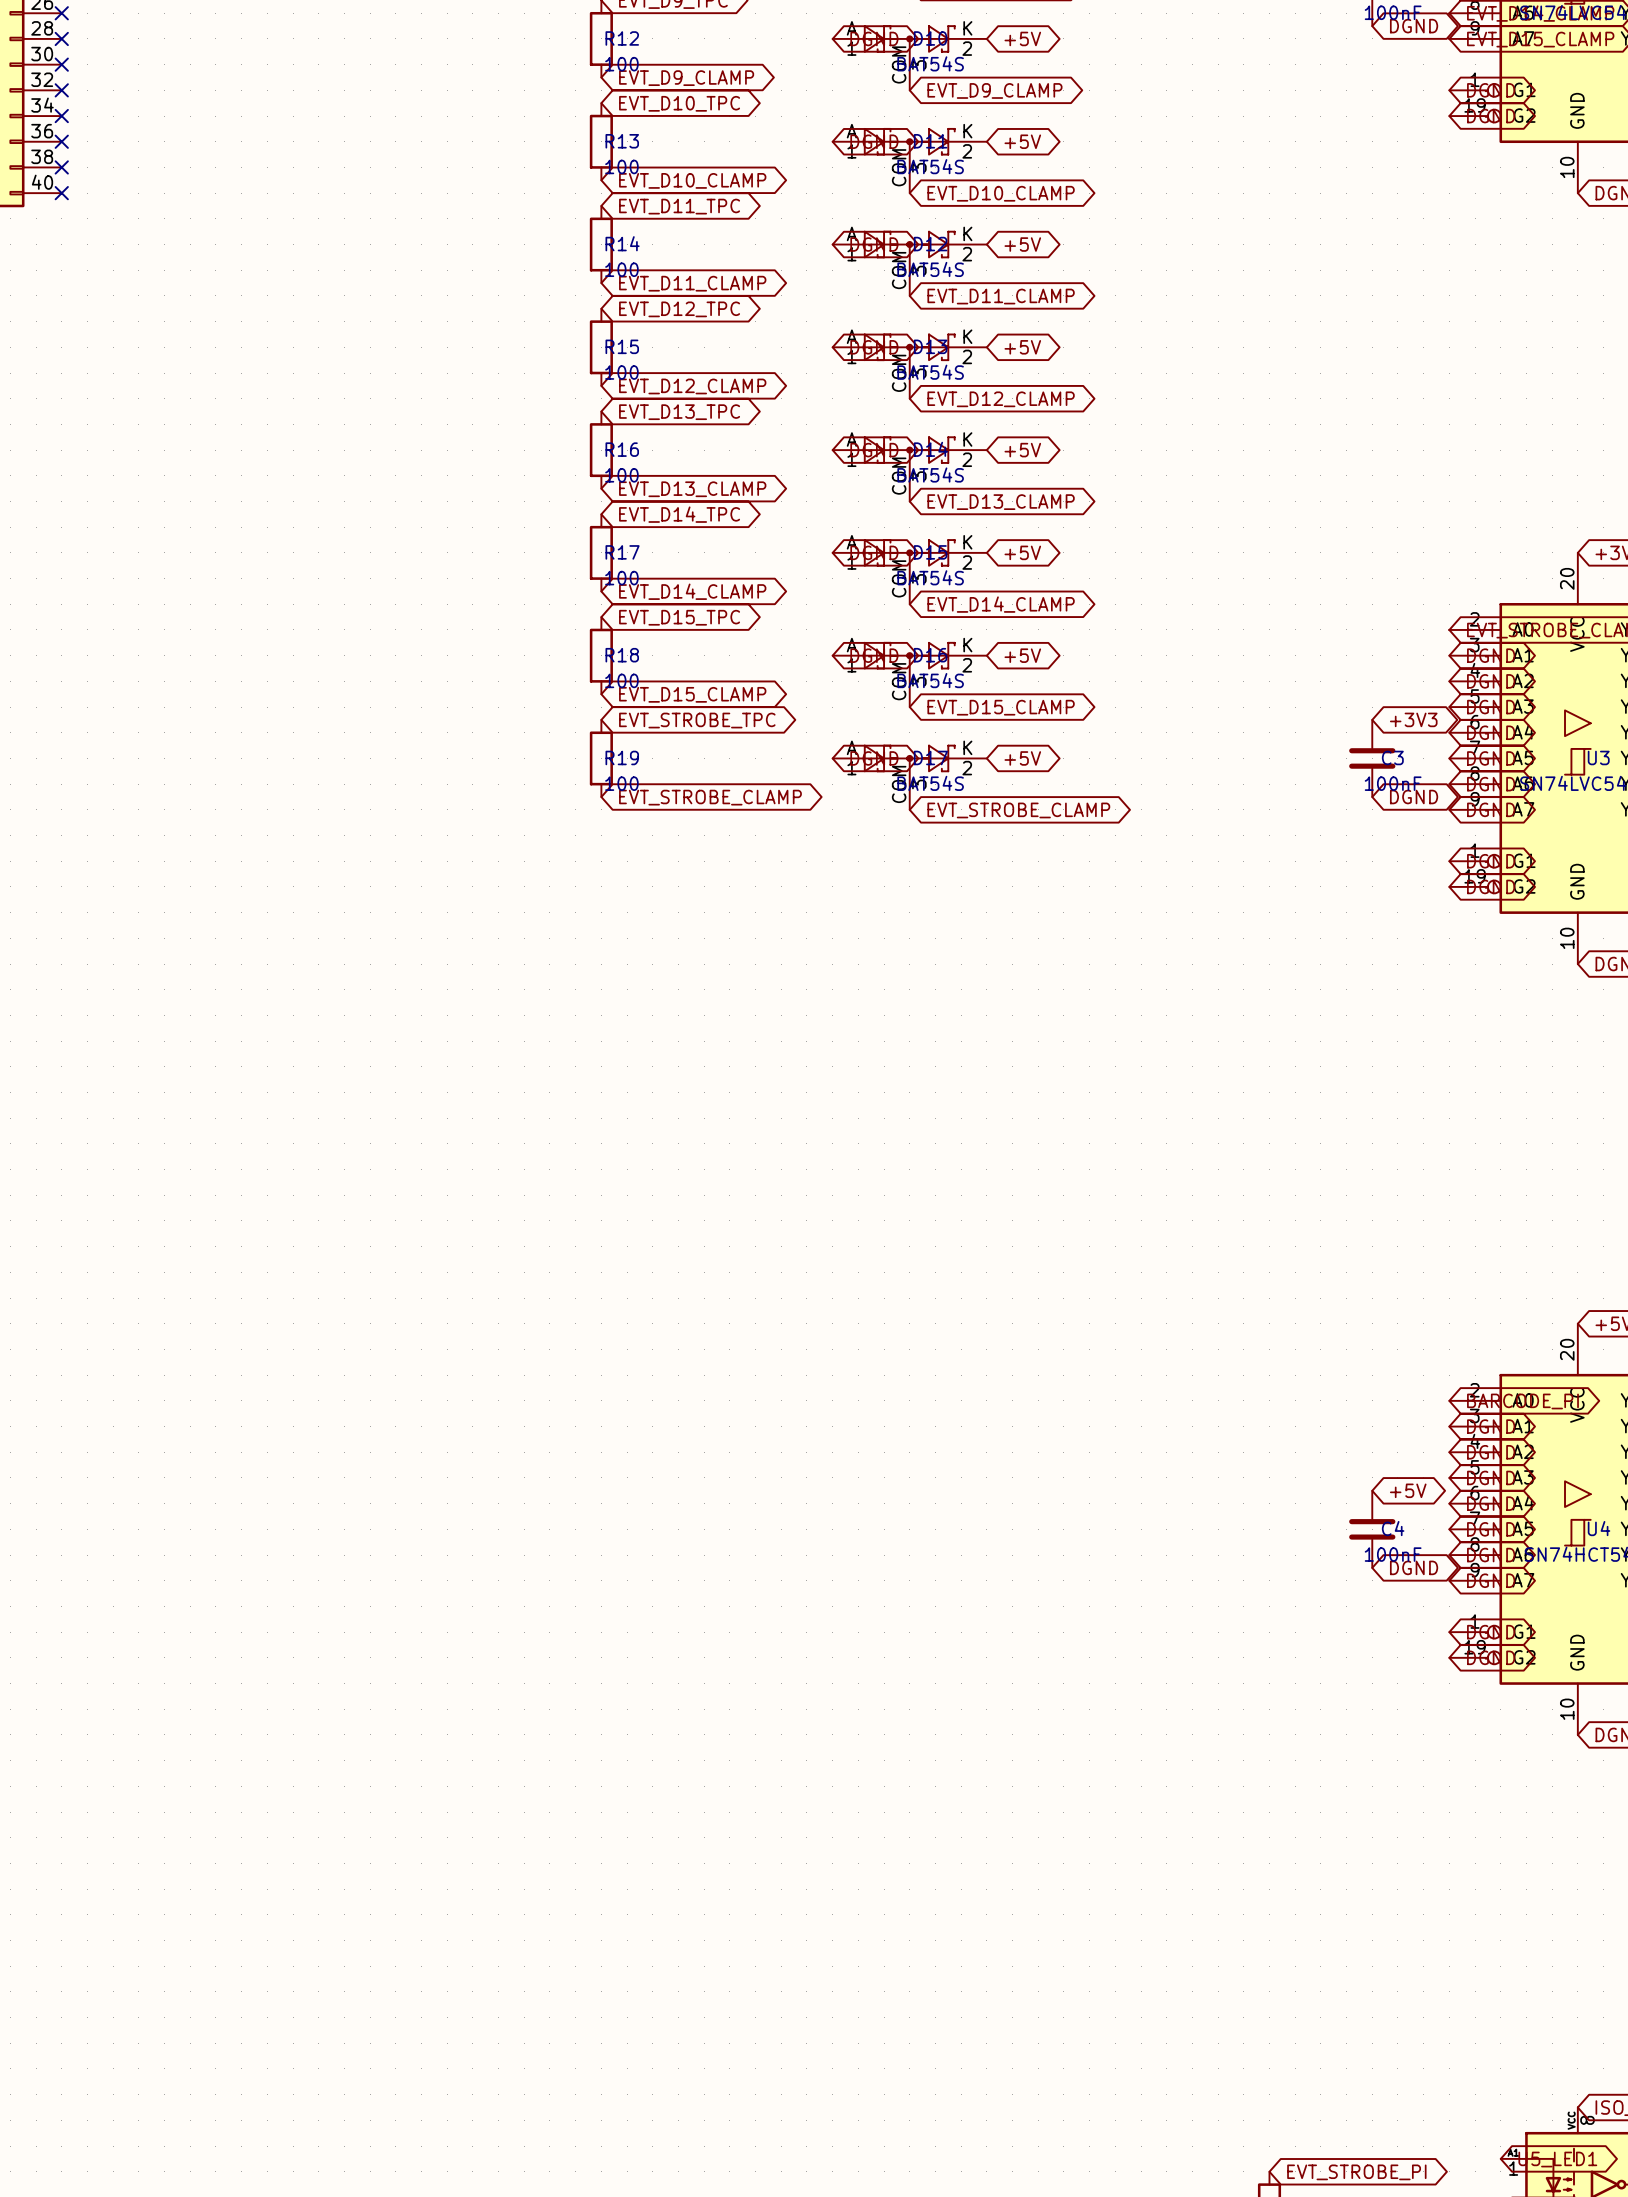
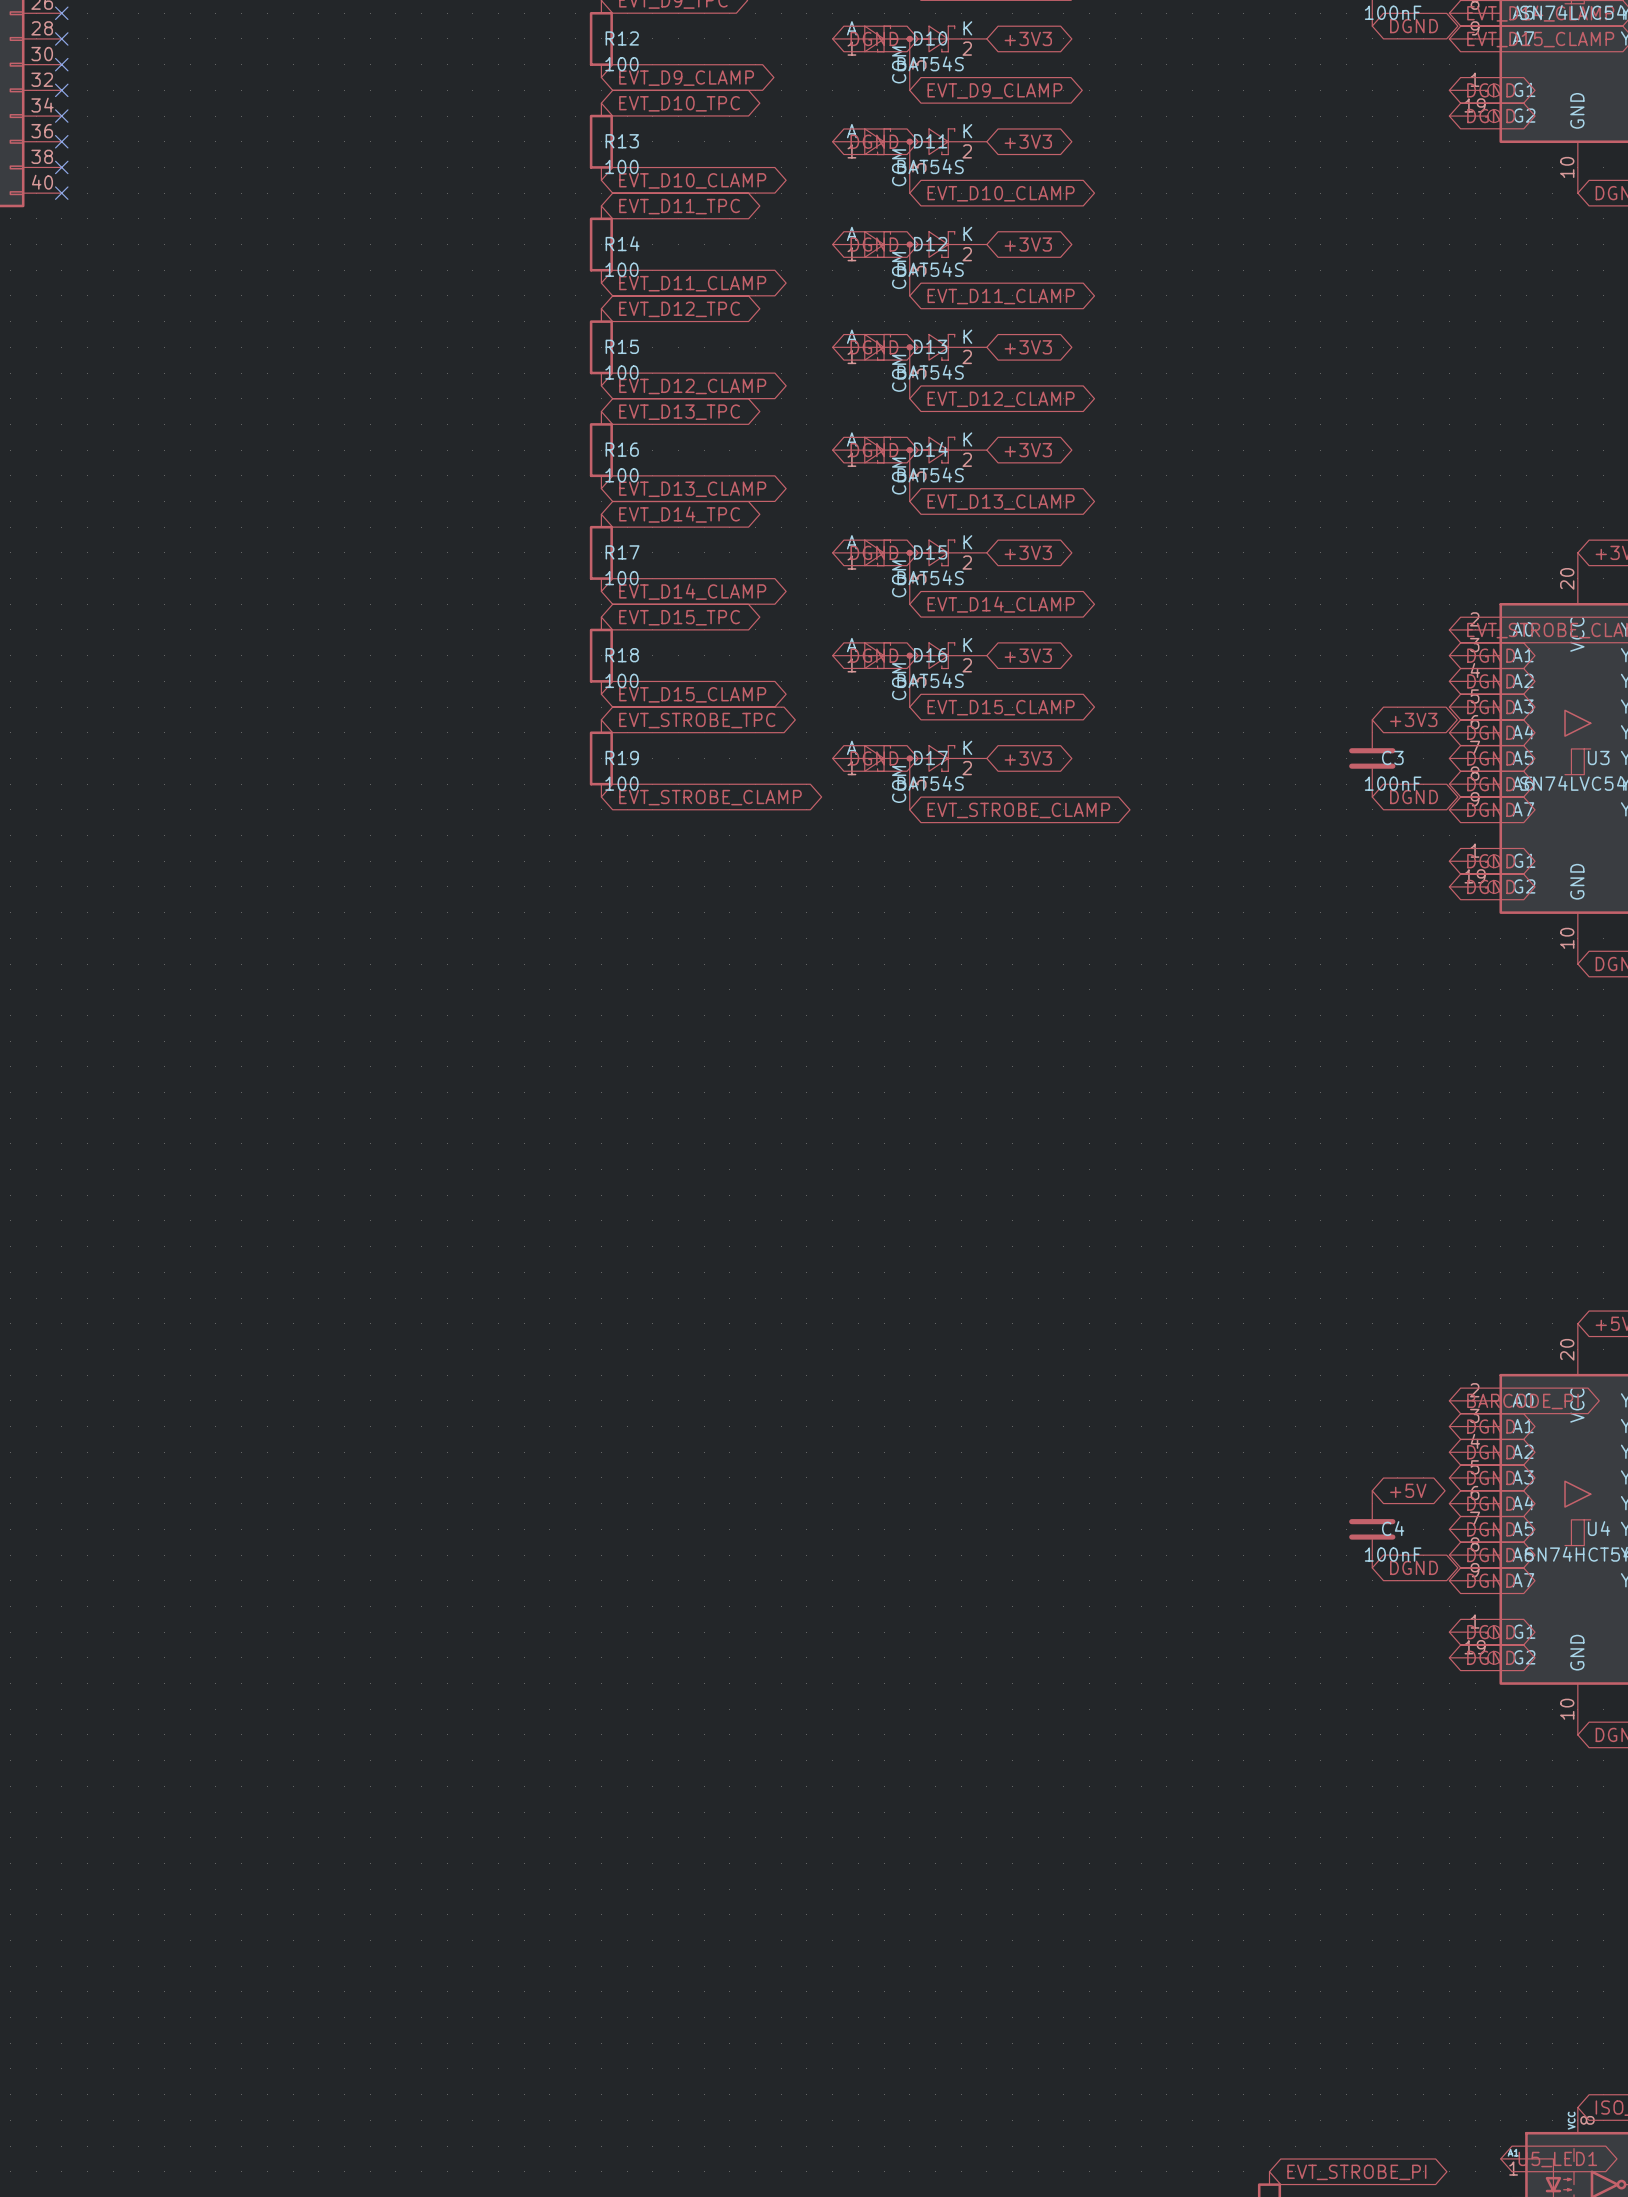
global label: +5V (1022, 38) -> +3V3 (1028, 38)
global label: +5V (1022, 141) -> +3V3 (1028, 141)
global label: +5V (1022, 244) -> +3V3 (1028, 244)
global label: +5V (1022, 347) -> +3V3 (1028, 347)
global label: +5V (1022, 450) -> +3V3 (1028, 450)
global label: +5V (1022, 552) -> +3V3 (1028, 552)
global label: +5V (1022, 655) -> +3V3 (1028, 655)
global label: +5V (1022, 758) -> +3V3 (1028, 758)

